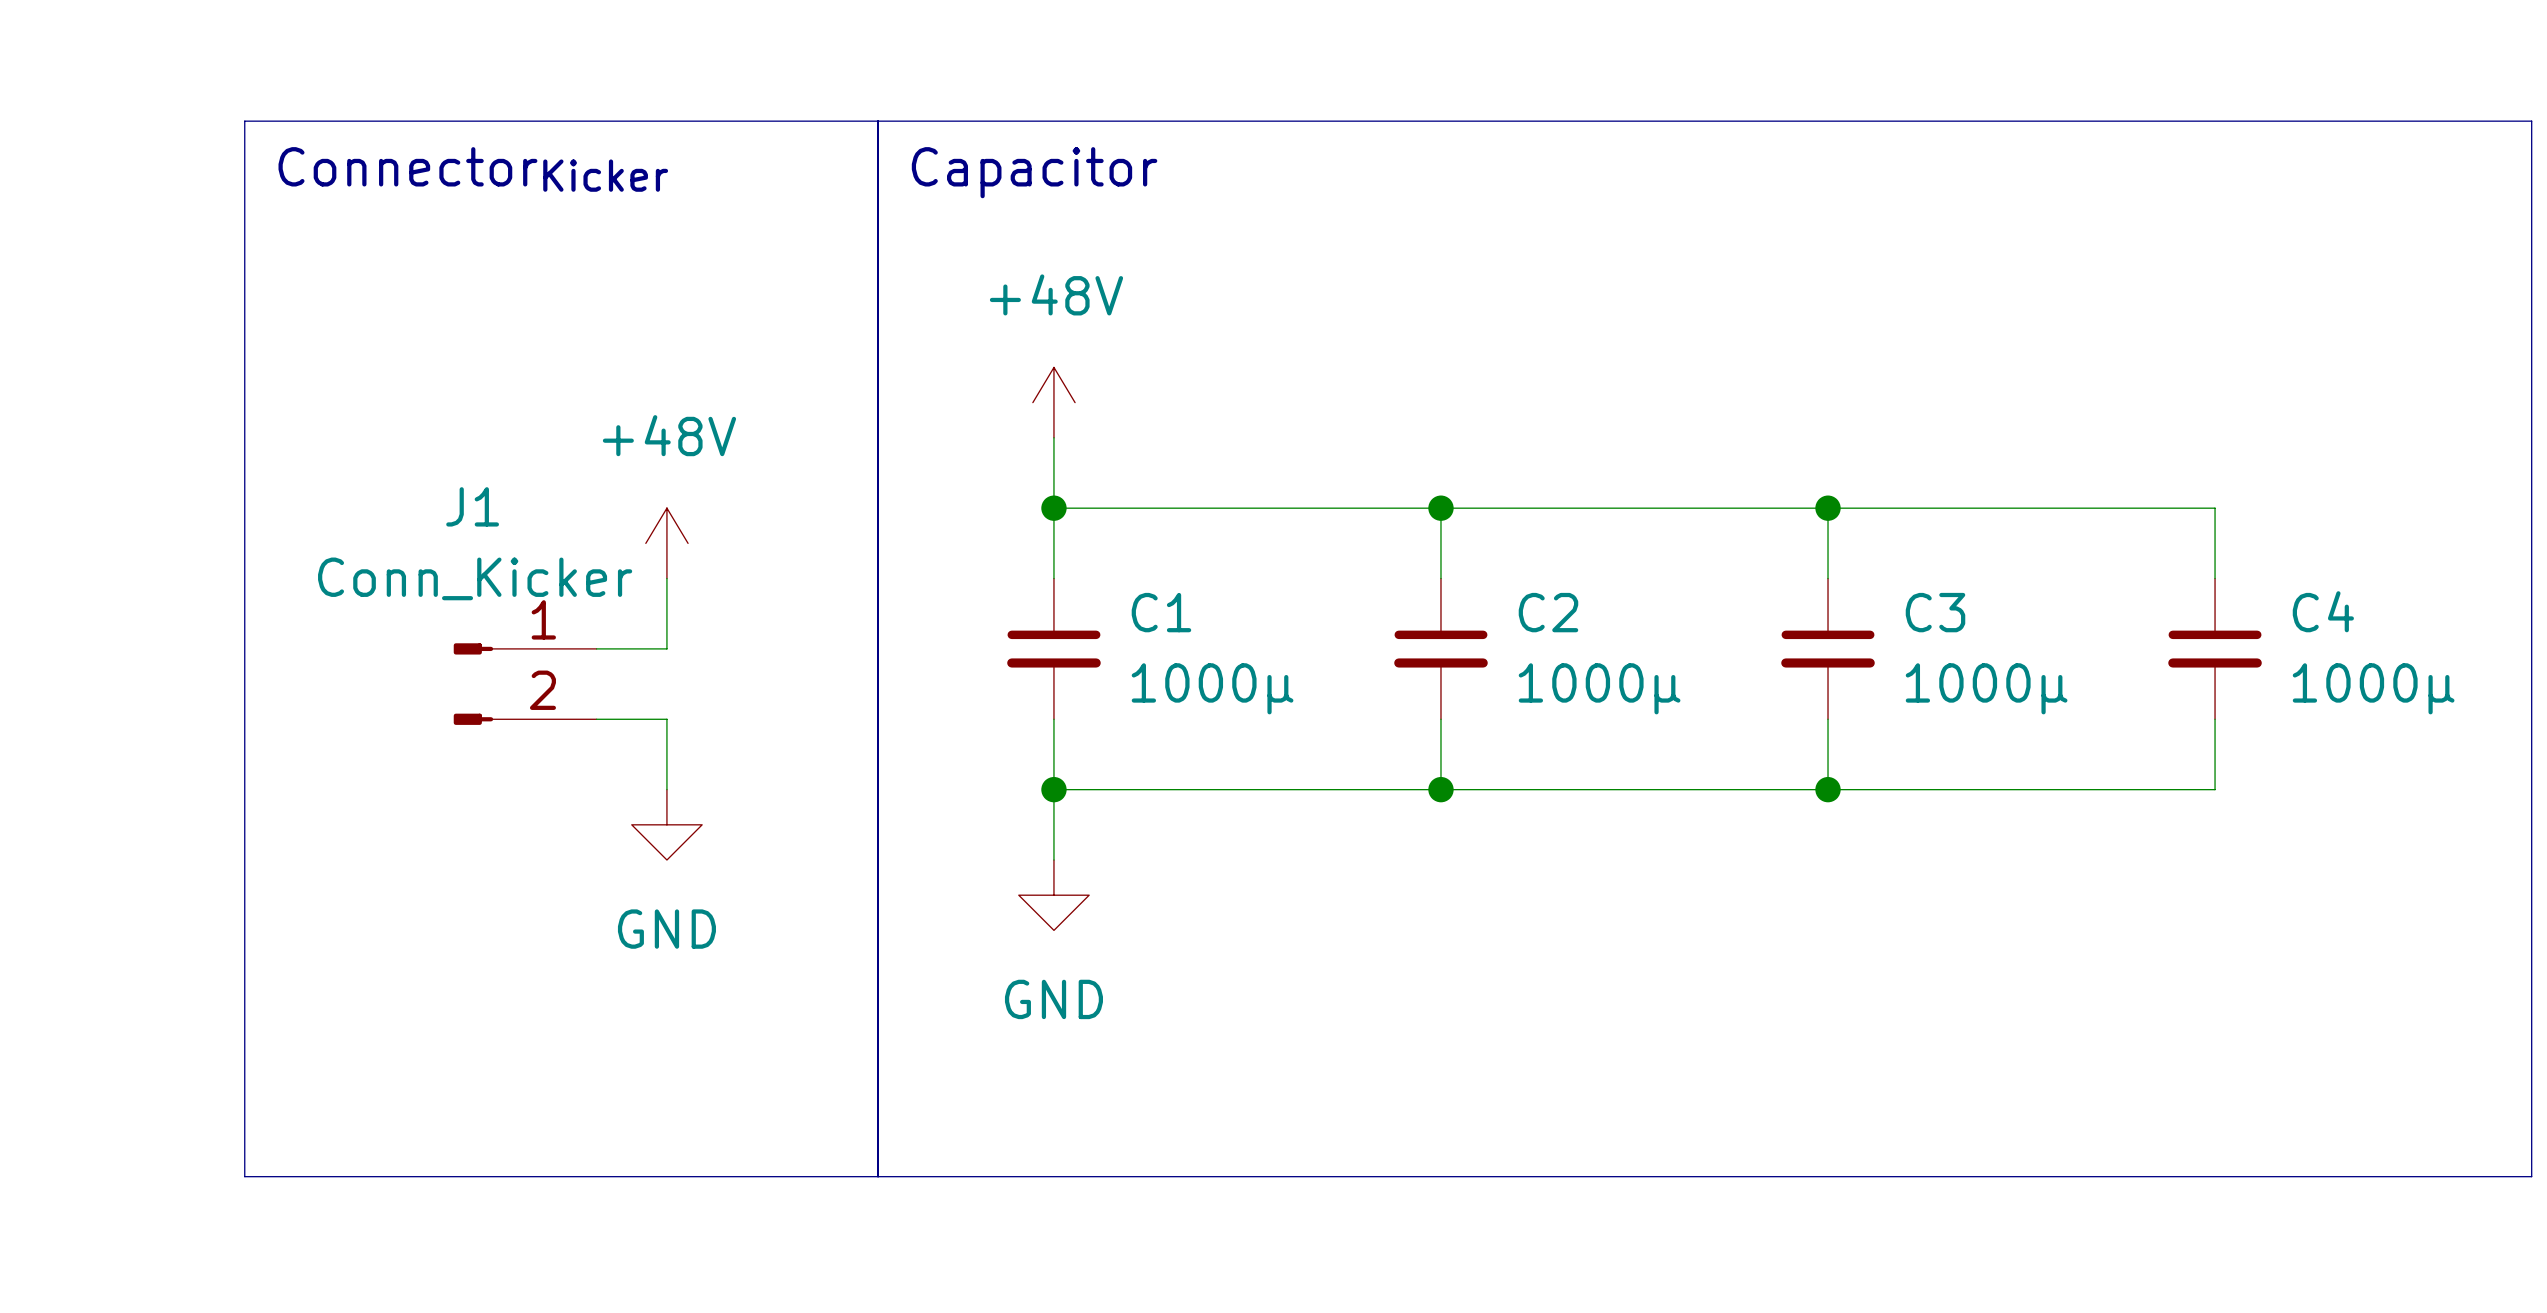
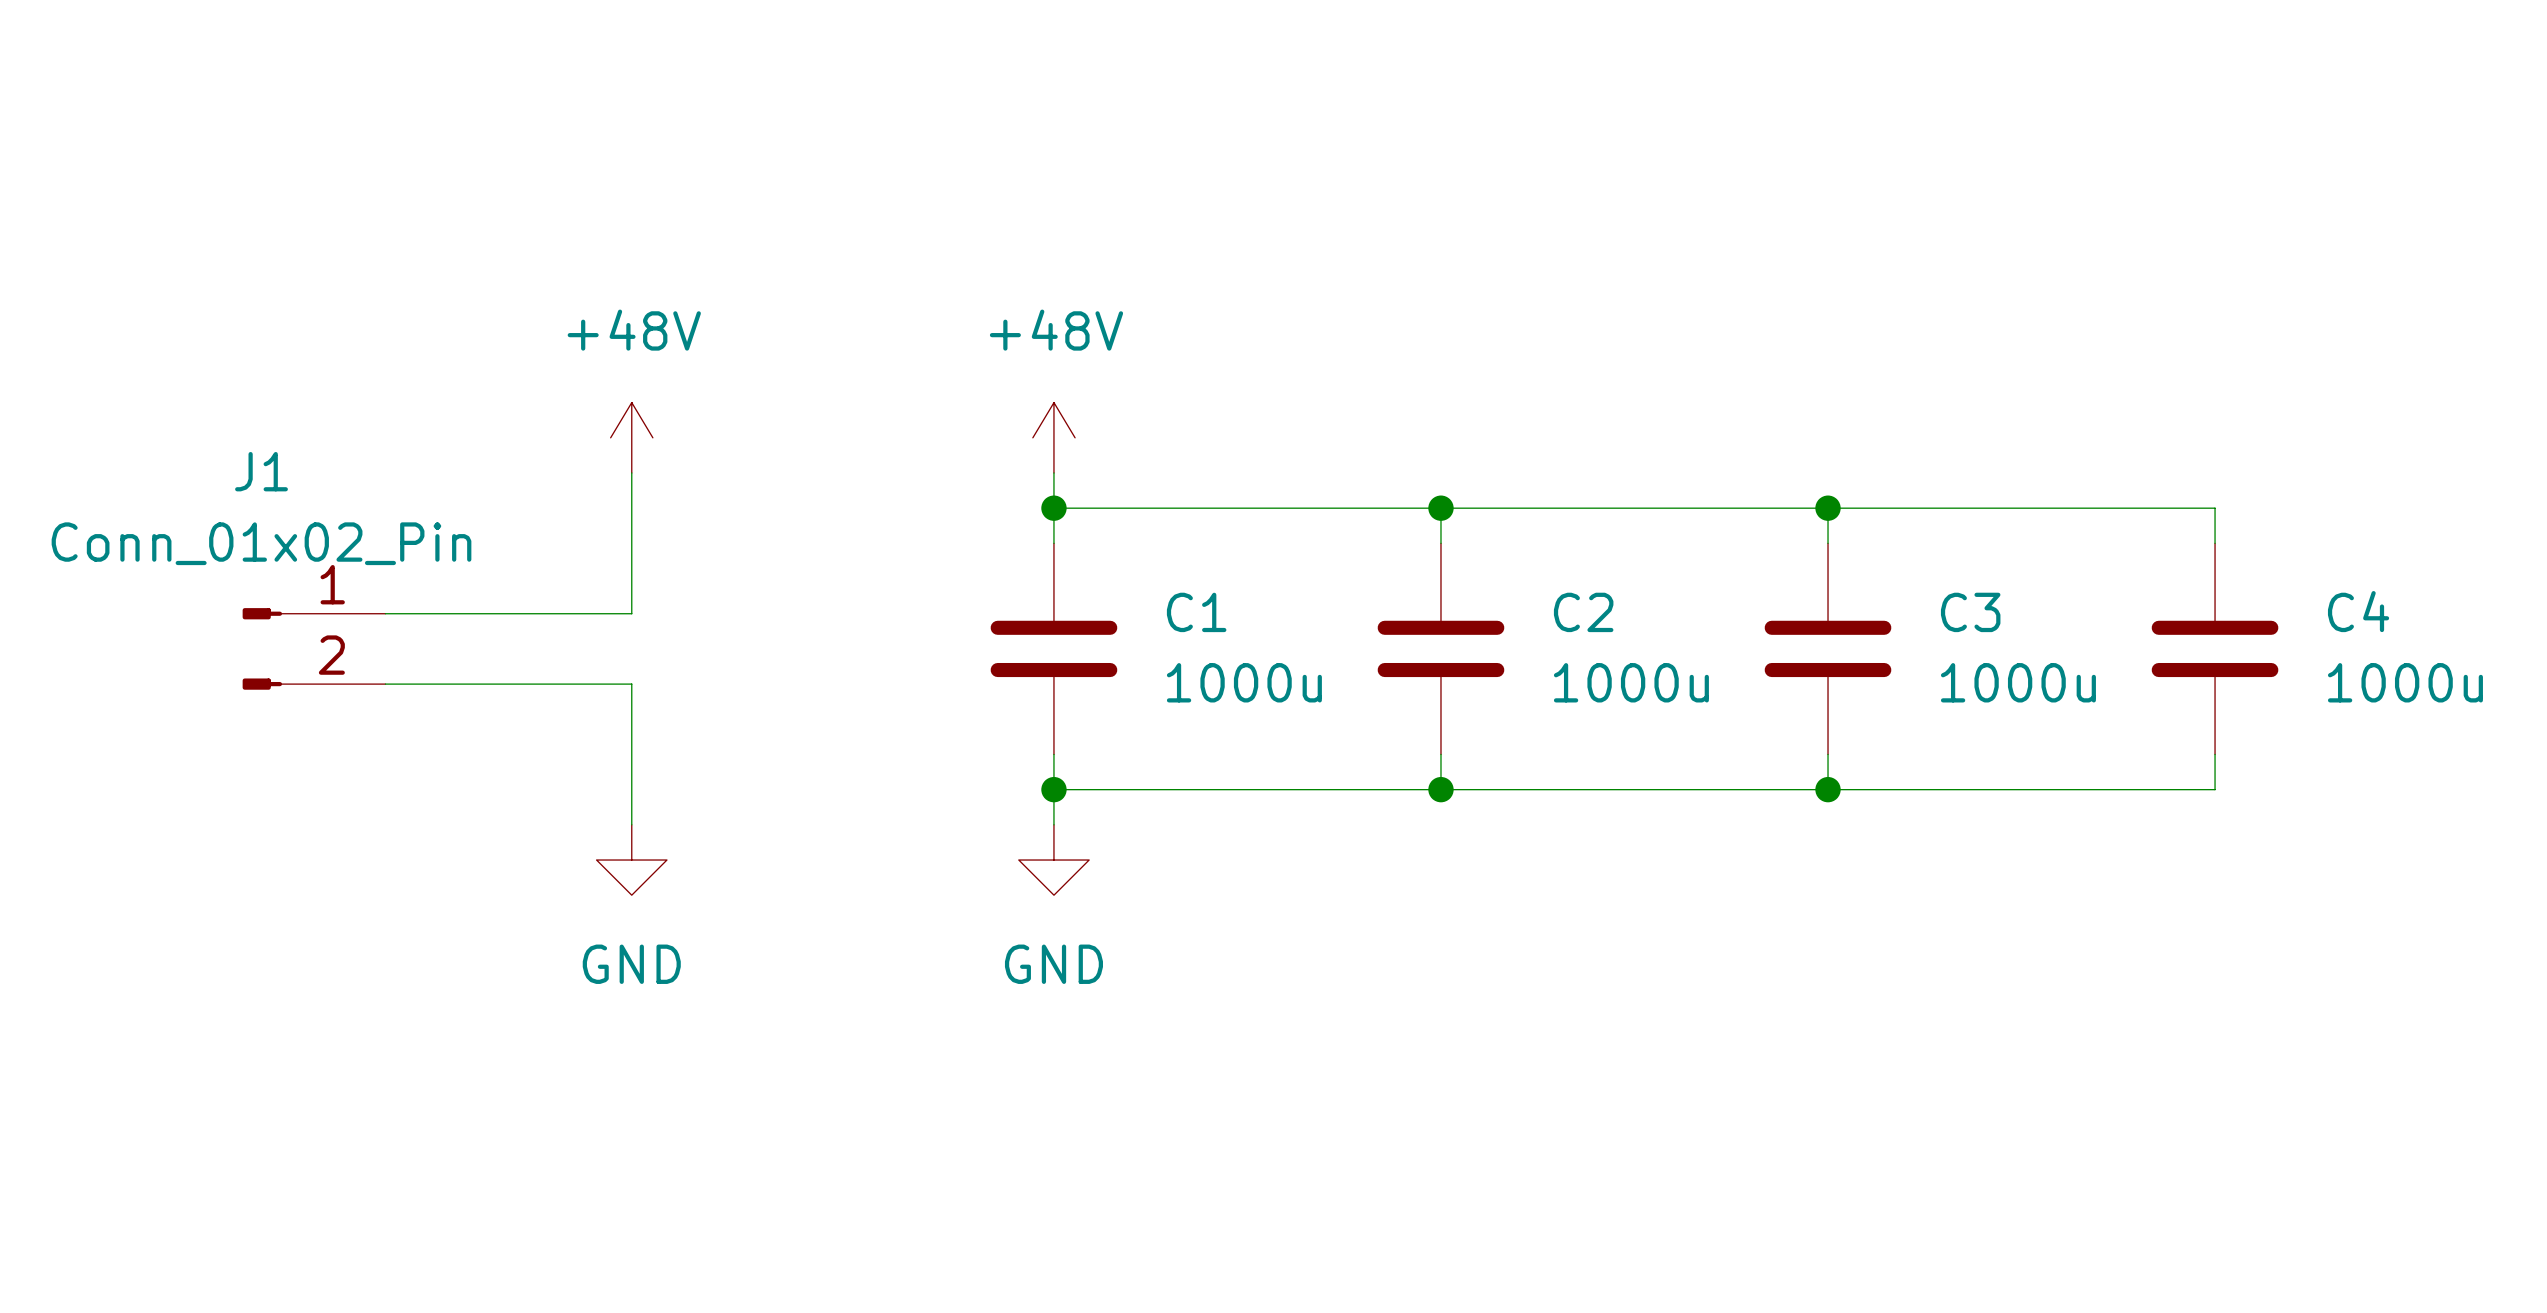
line: (244, 121) (2531, 121) (2531, 1176) (244, 1176) (244, 121) -> none
line: (878, 121) (878, 1176) -> none
text: ConnectorKicker (473, 169) -> none
text: Capacitor (1034, 172) -> none
power symbol position: +48V (1053, 402) -> +48V (1053, 437)
wire: none -> (631, 472) (631, 613) (385, 613)
power symbol position: +48V (666, 543) -> +48V (631, 437)
J1 value: Conn_Kicker (475, 578) -> Conn_01x02_Pin (261, 543)
wire: (666, 578) (666, 648) (596, 648) -> none
C1 symbol: [1007, 578, 1101, 720] -> [990, 543, 1118, 755]
C2 symbol: [1394, 578, 1488, 720] -> [1377, 543, 1505, 755]
C3 symbol: [1781, 578, 1875, 720] -> [1764, 543, 1892, 755]
C4 symbol: [2168, 578, 2262, 720] -> [2151, 543, 2279, 755]
wire: none -> (385, 684) (631, 684) (631, 824)
J1 position: (525, 684) -> (314, 648)
C1 value: 1000μ (1212, 688) -> 1000u (1244, 682)
C2 value: 1000μ (1599, 688) -> 1000u (1631, 682)
C3 value: 1000μ (1986, 688) -> 1000u (2018, 682)
C4 value: 1000μ (2373, 688) -> 1000u (2405, 682)
wire: (596, 719) (666, 719) (666, 789) -> none
power symbol position: GND (666, 824) -> GND (631, 860)
power symbol position: GND (1053, 895) -> GND (1053, 860)

